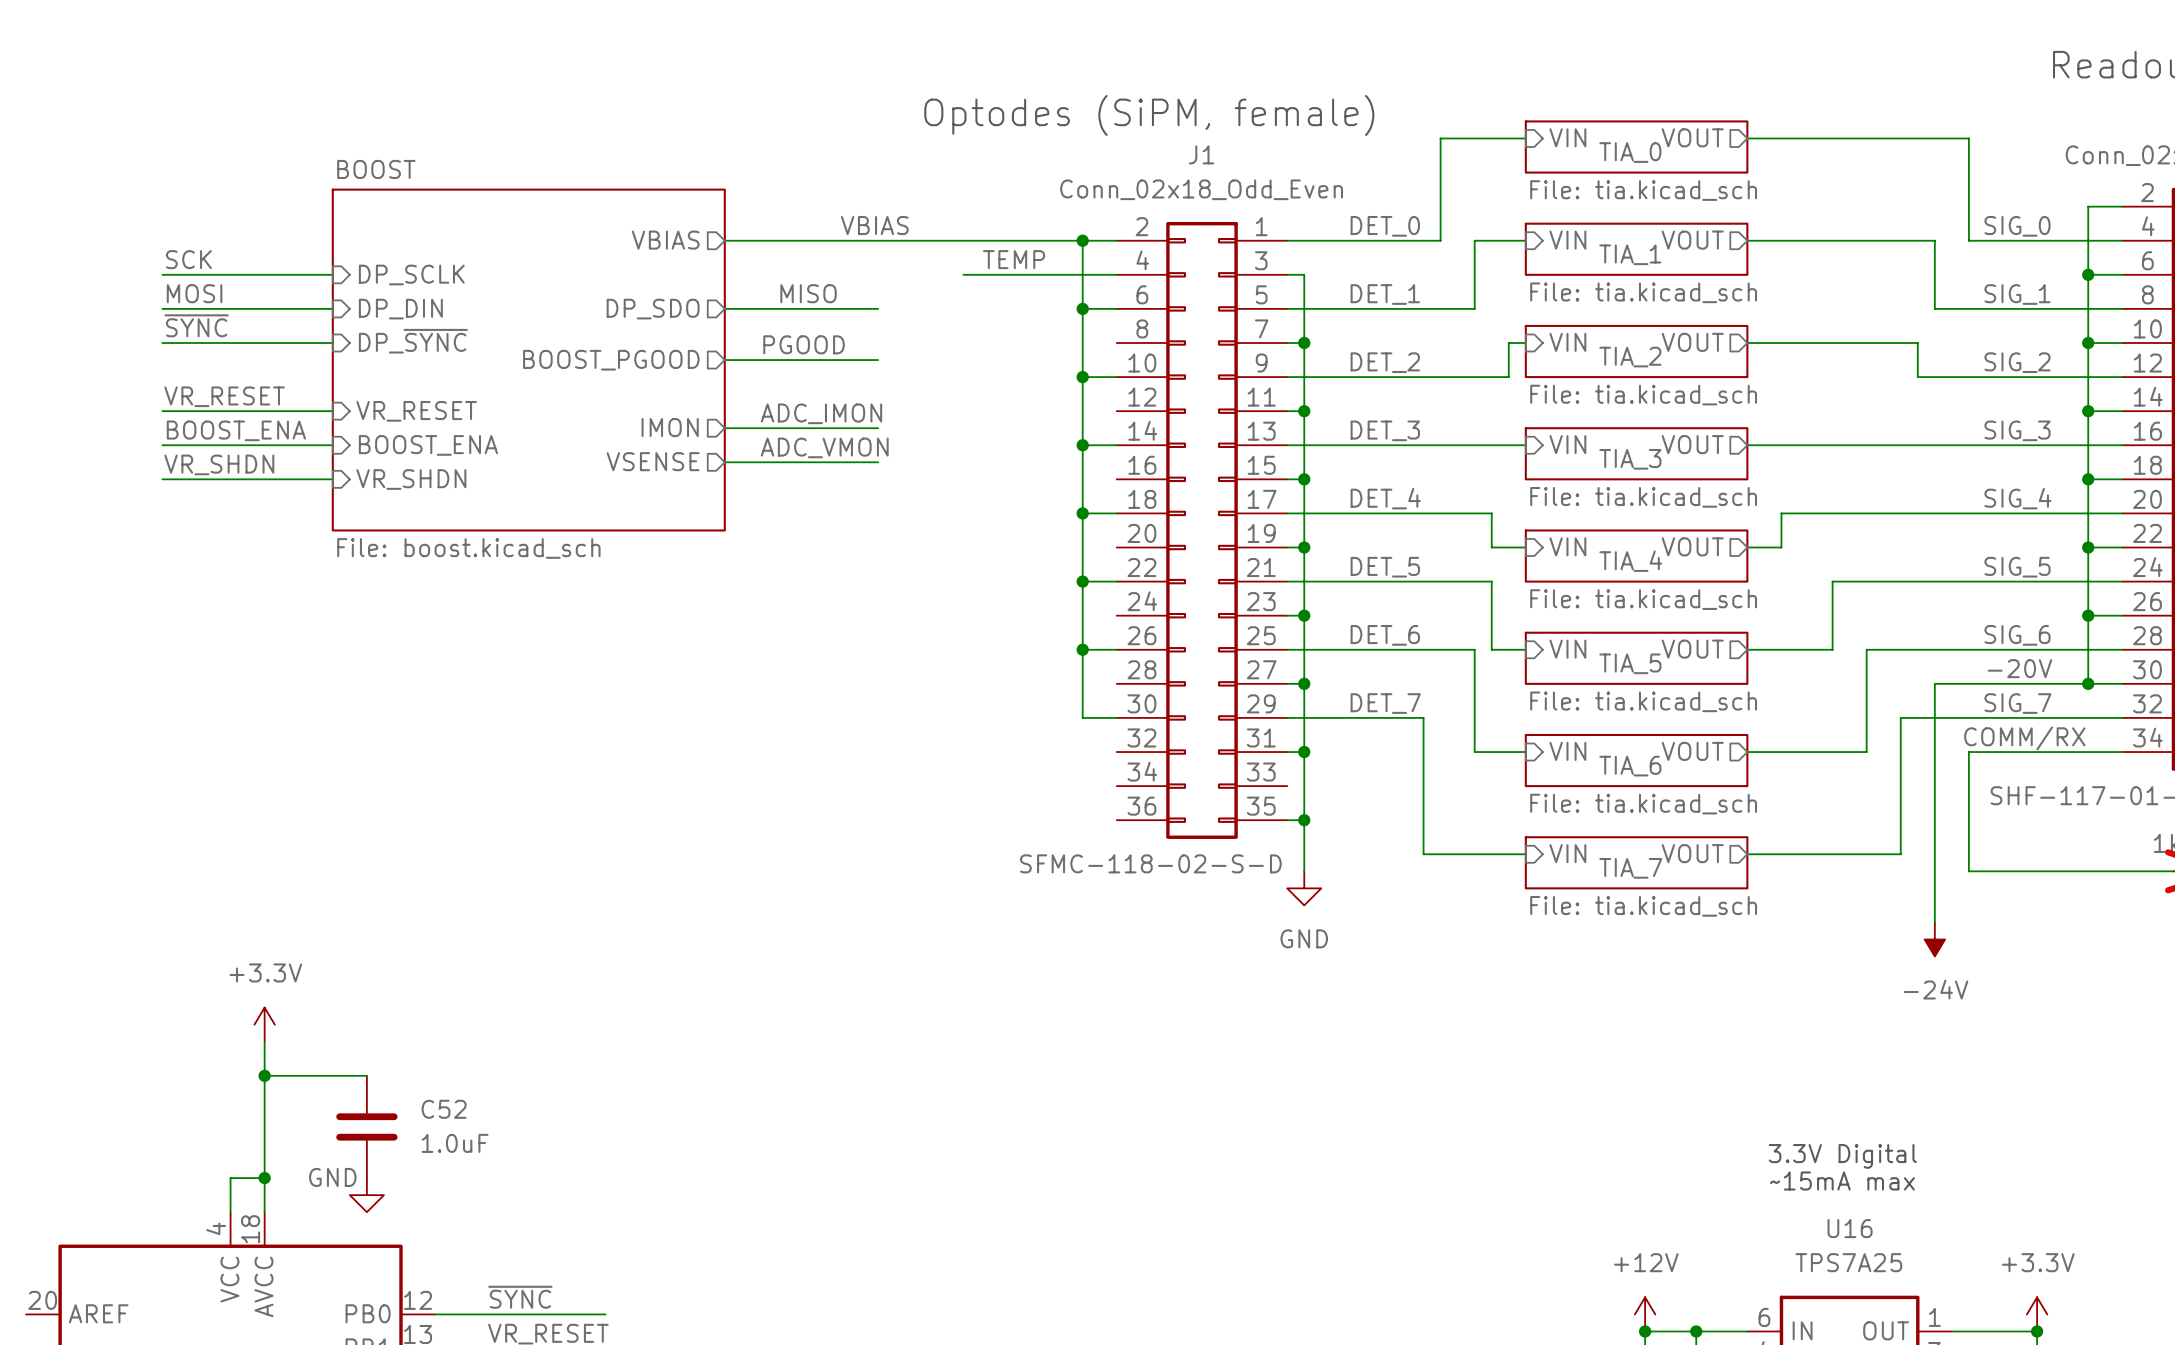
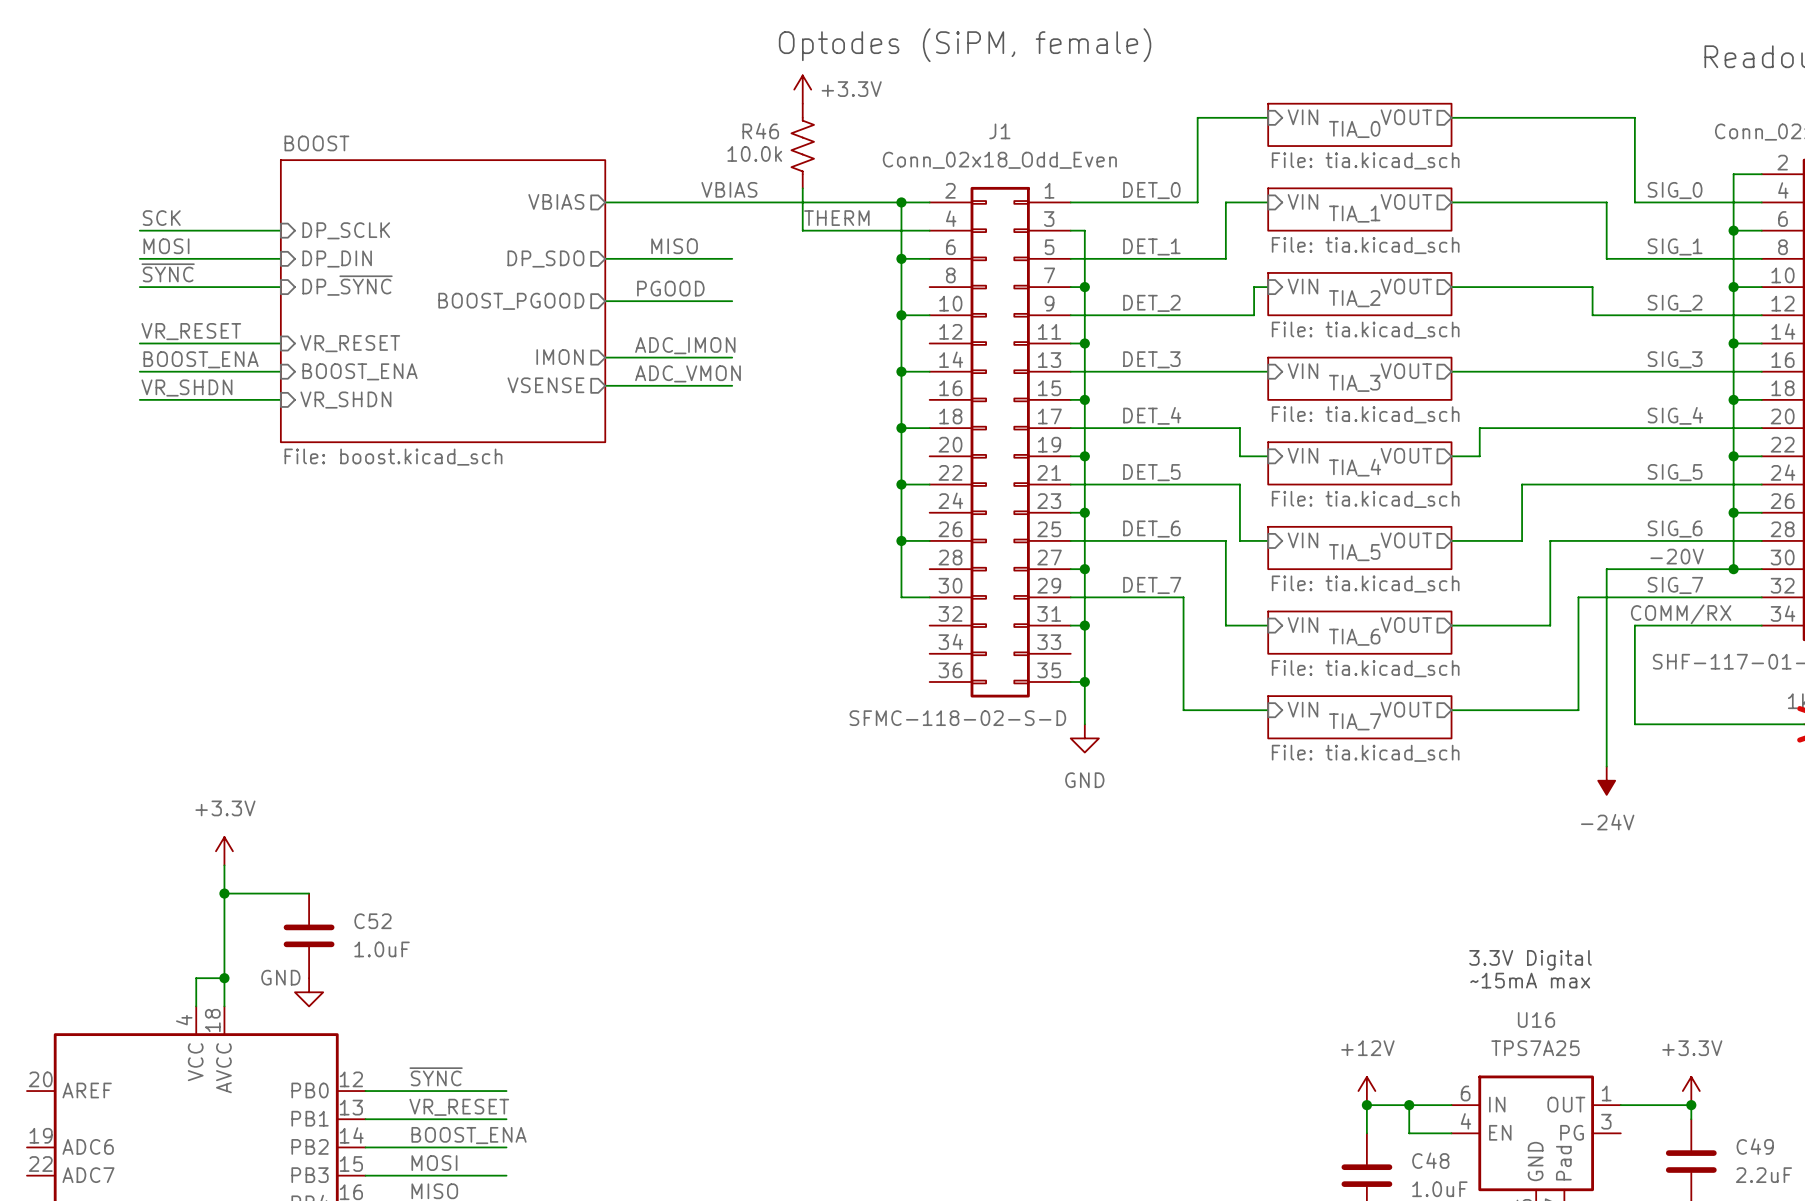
power symbol: none -> +3.3V (802, 89)
text position: Optodes (SiPM, female) (1149, 115) -> Optodes (SiPM, female) (965, 45)
R46: none -> 10.0k (802, 146)
wire: none -> (802, 188) (802, 230)
label: TEMP (1013, 259) -> THERM (836, 218)

